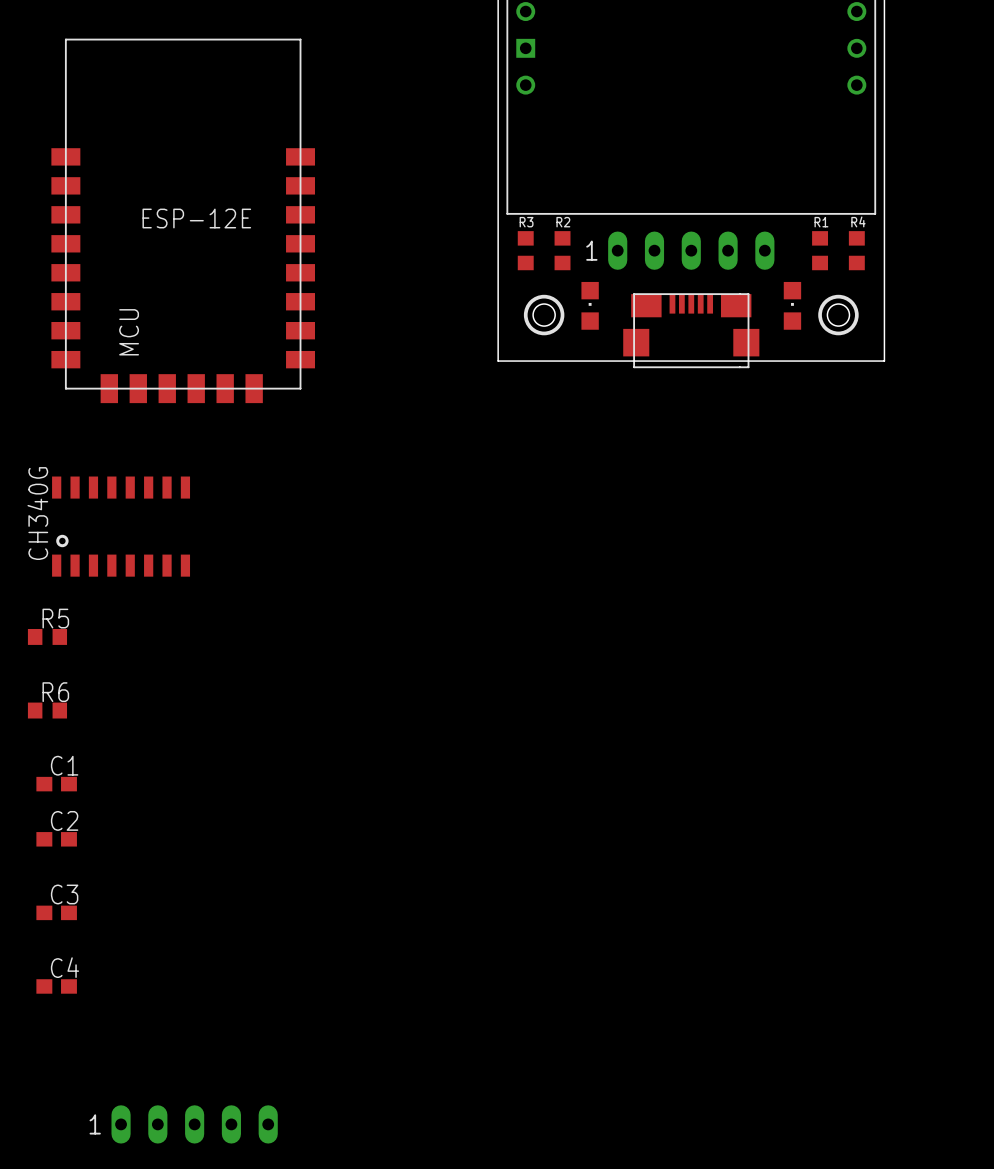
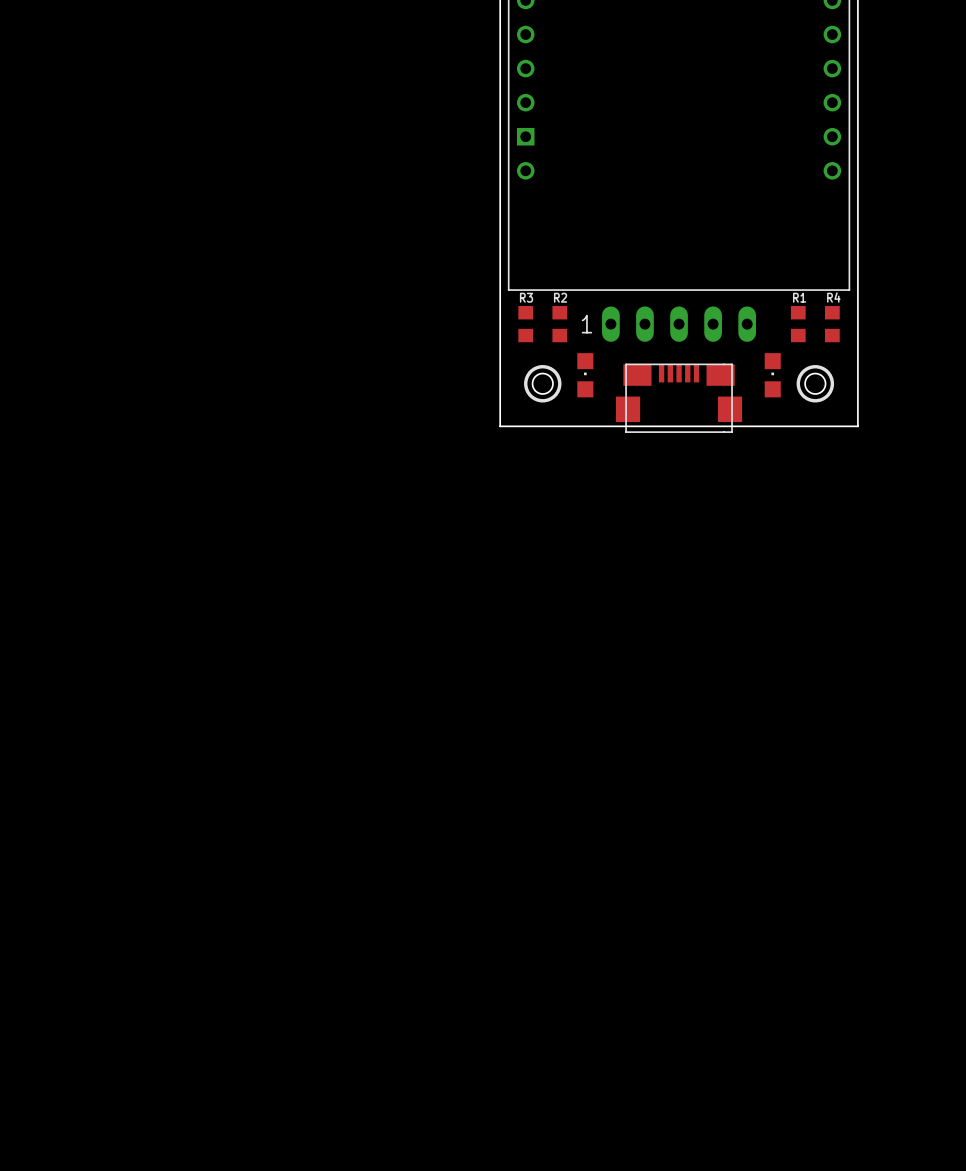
MCU: (183, 220) -> none
part: (121, 526) -> none
R5: (47, 636) -> none
R6: (47, 710) -> none
C1: (56, 784) -> none
C2: (56, 839) -> none
C3: (56, 912) -> none
C4: (56, 986) -> none
part: (194, 1124) -> none

